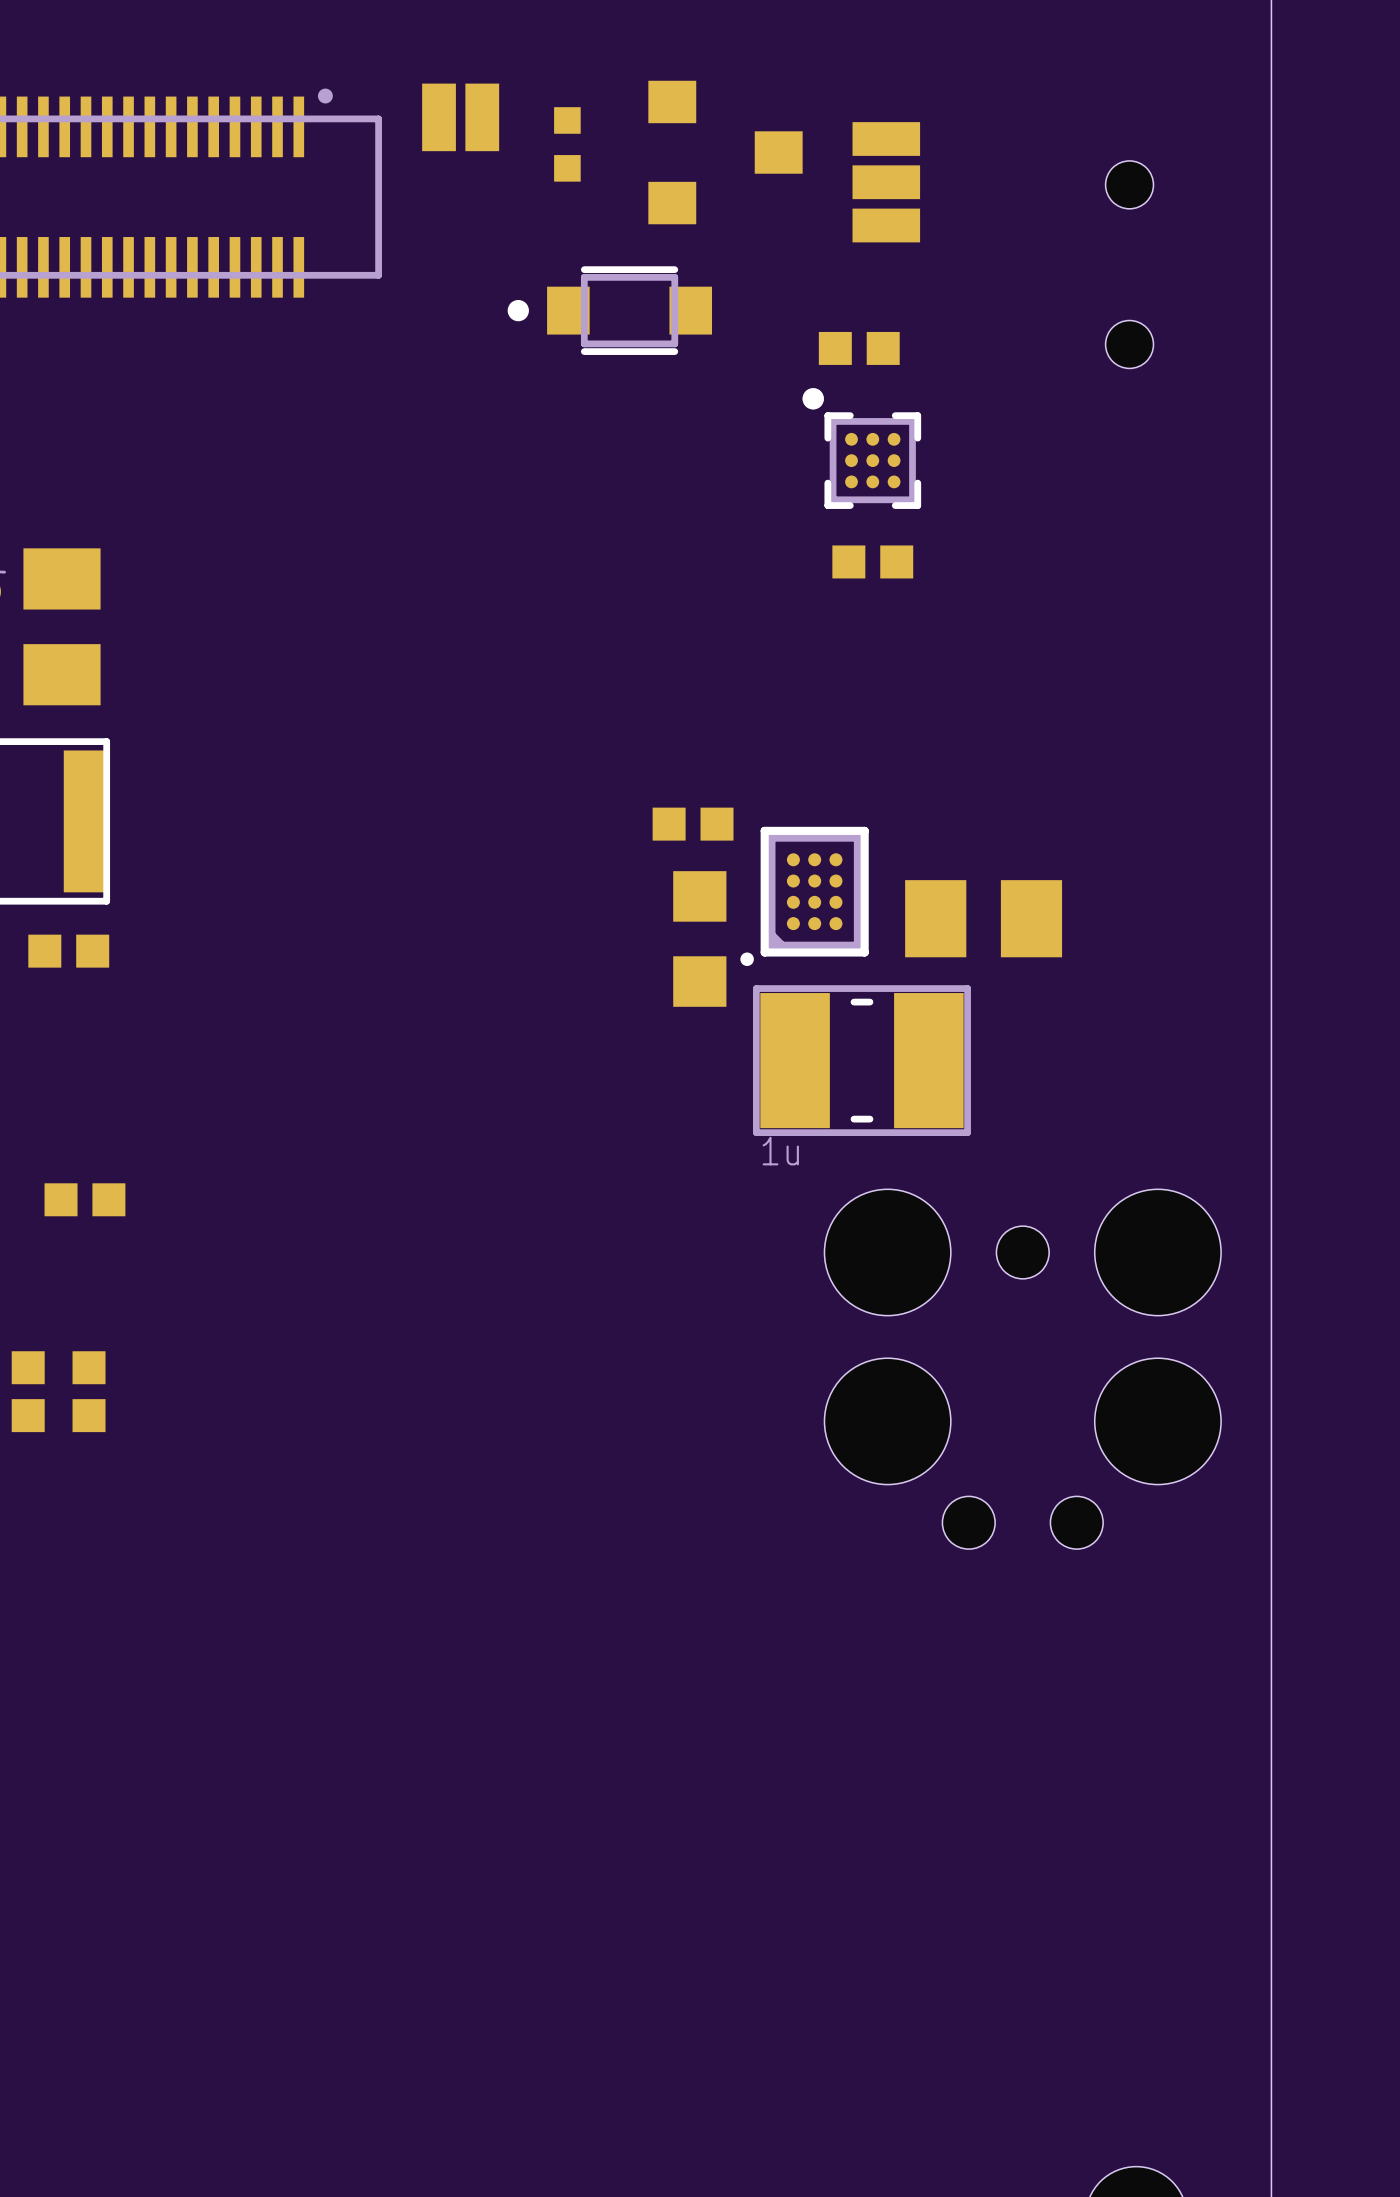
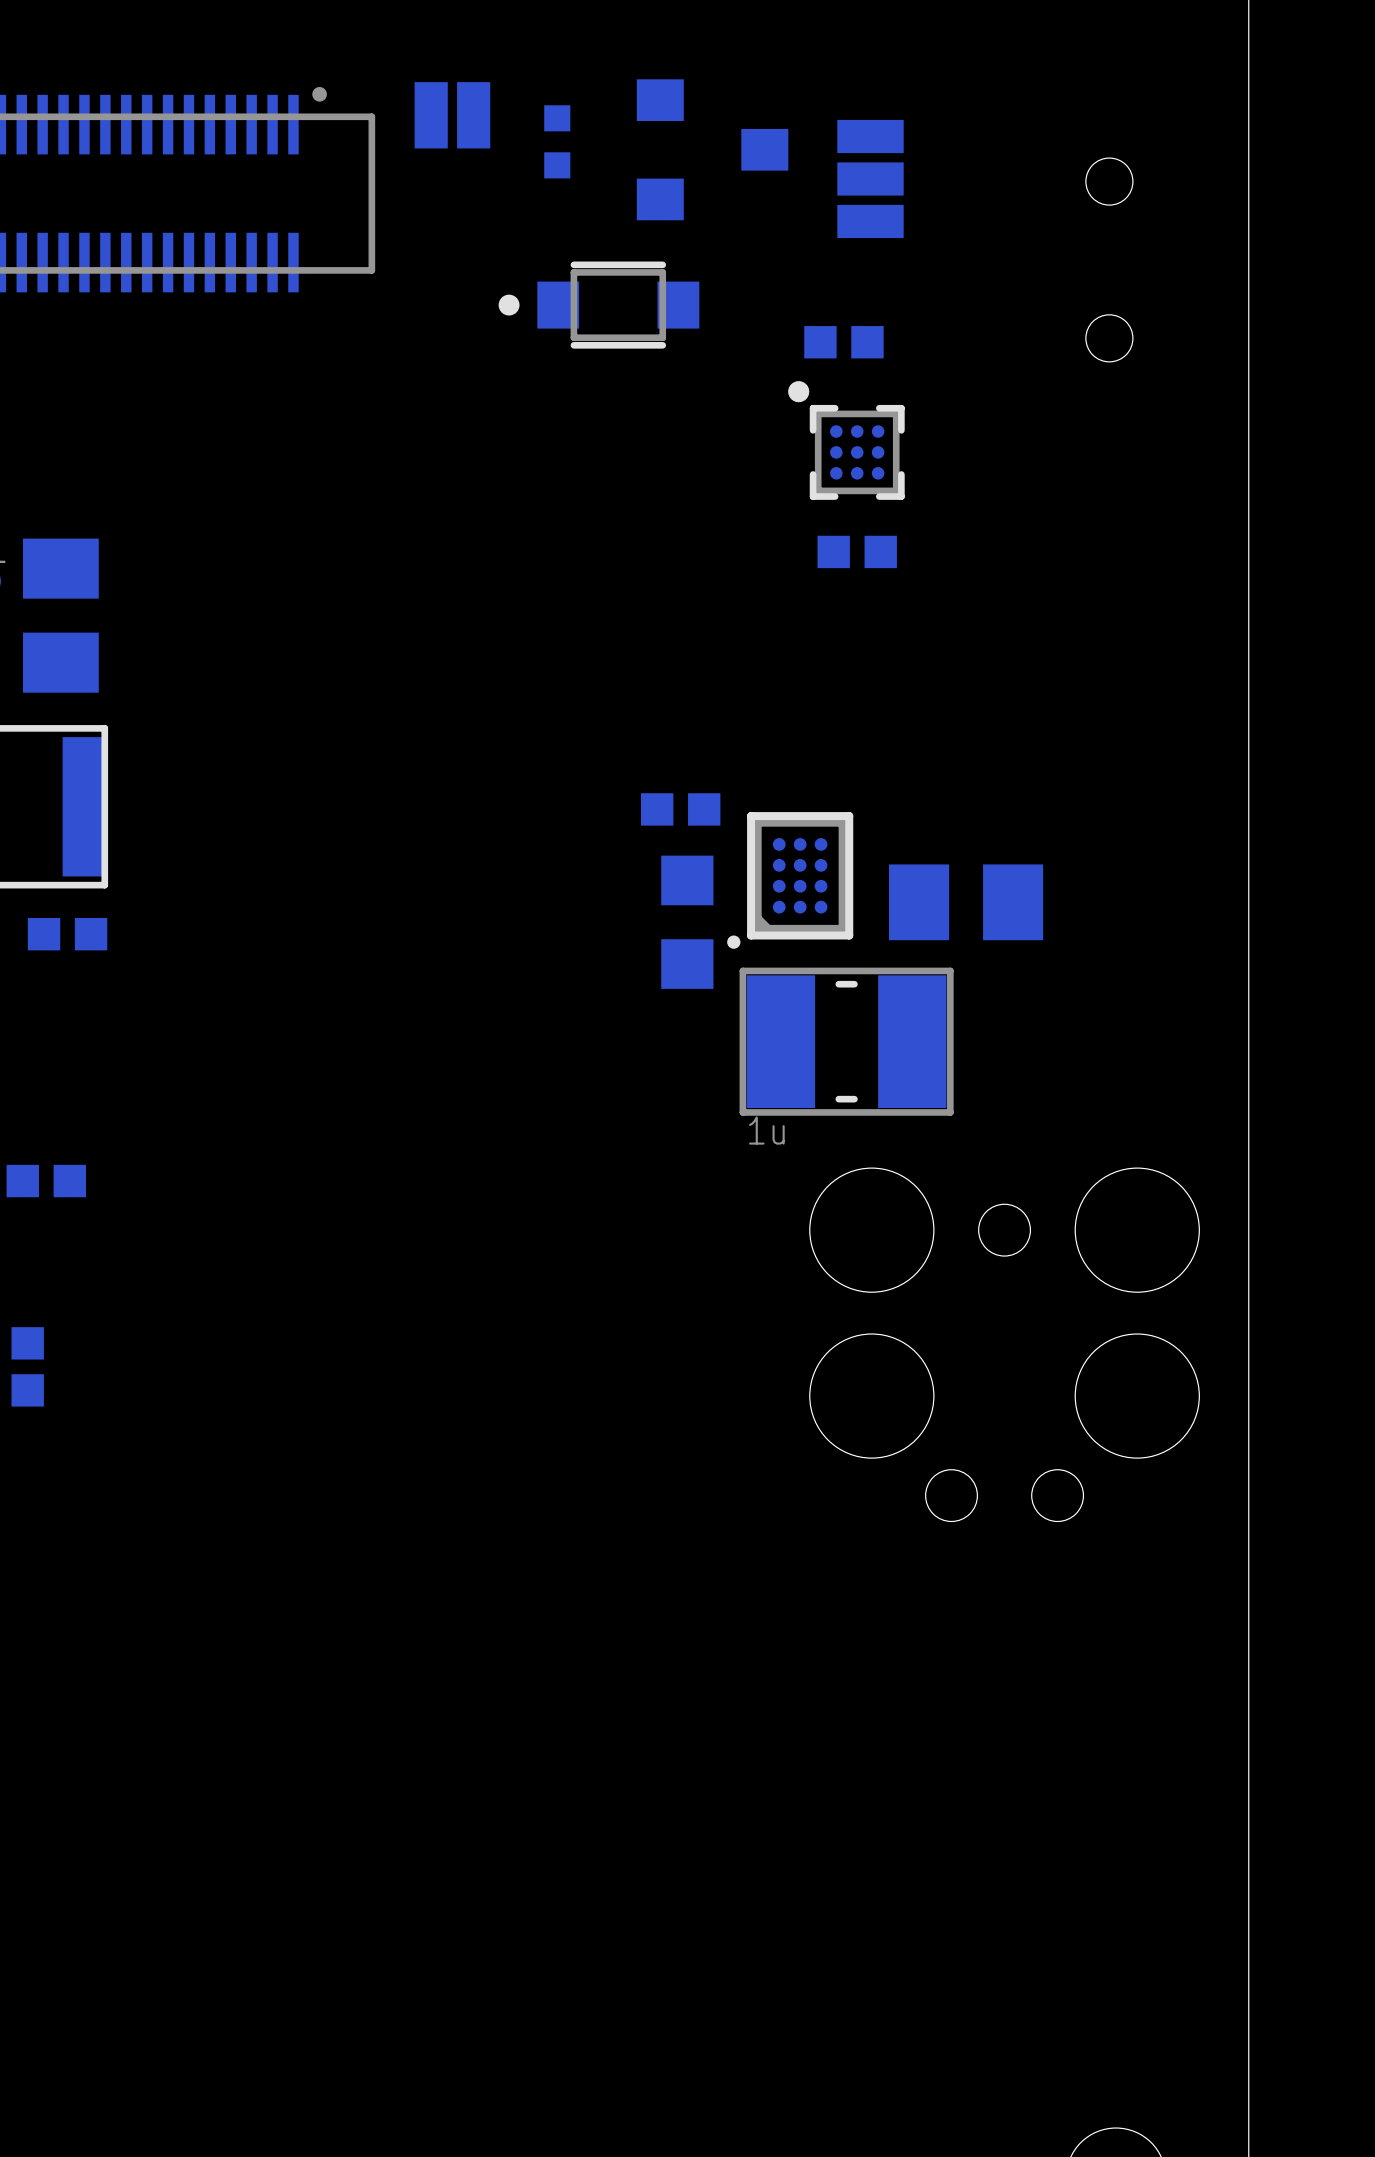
part position: (84, 1199) -> (46, 1181)
part: (89, 1391) -> none

